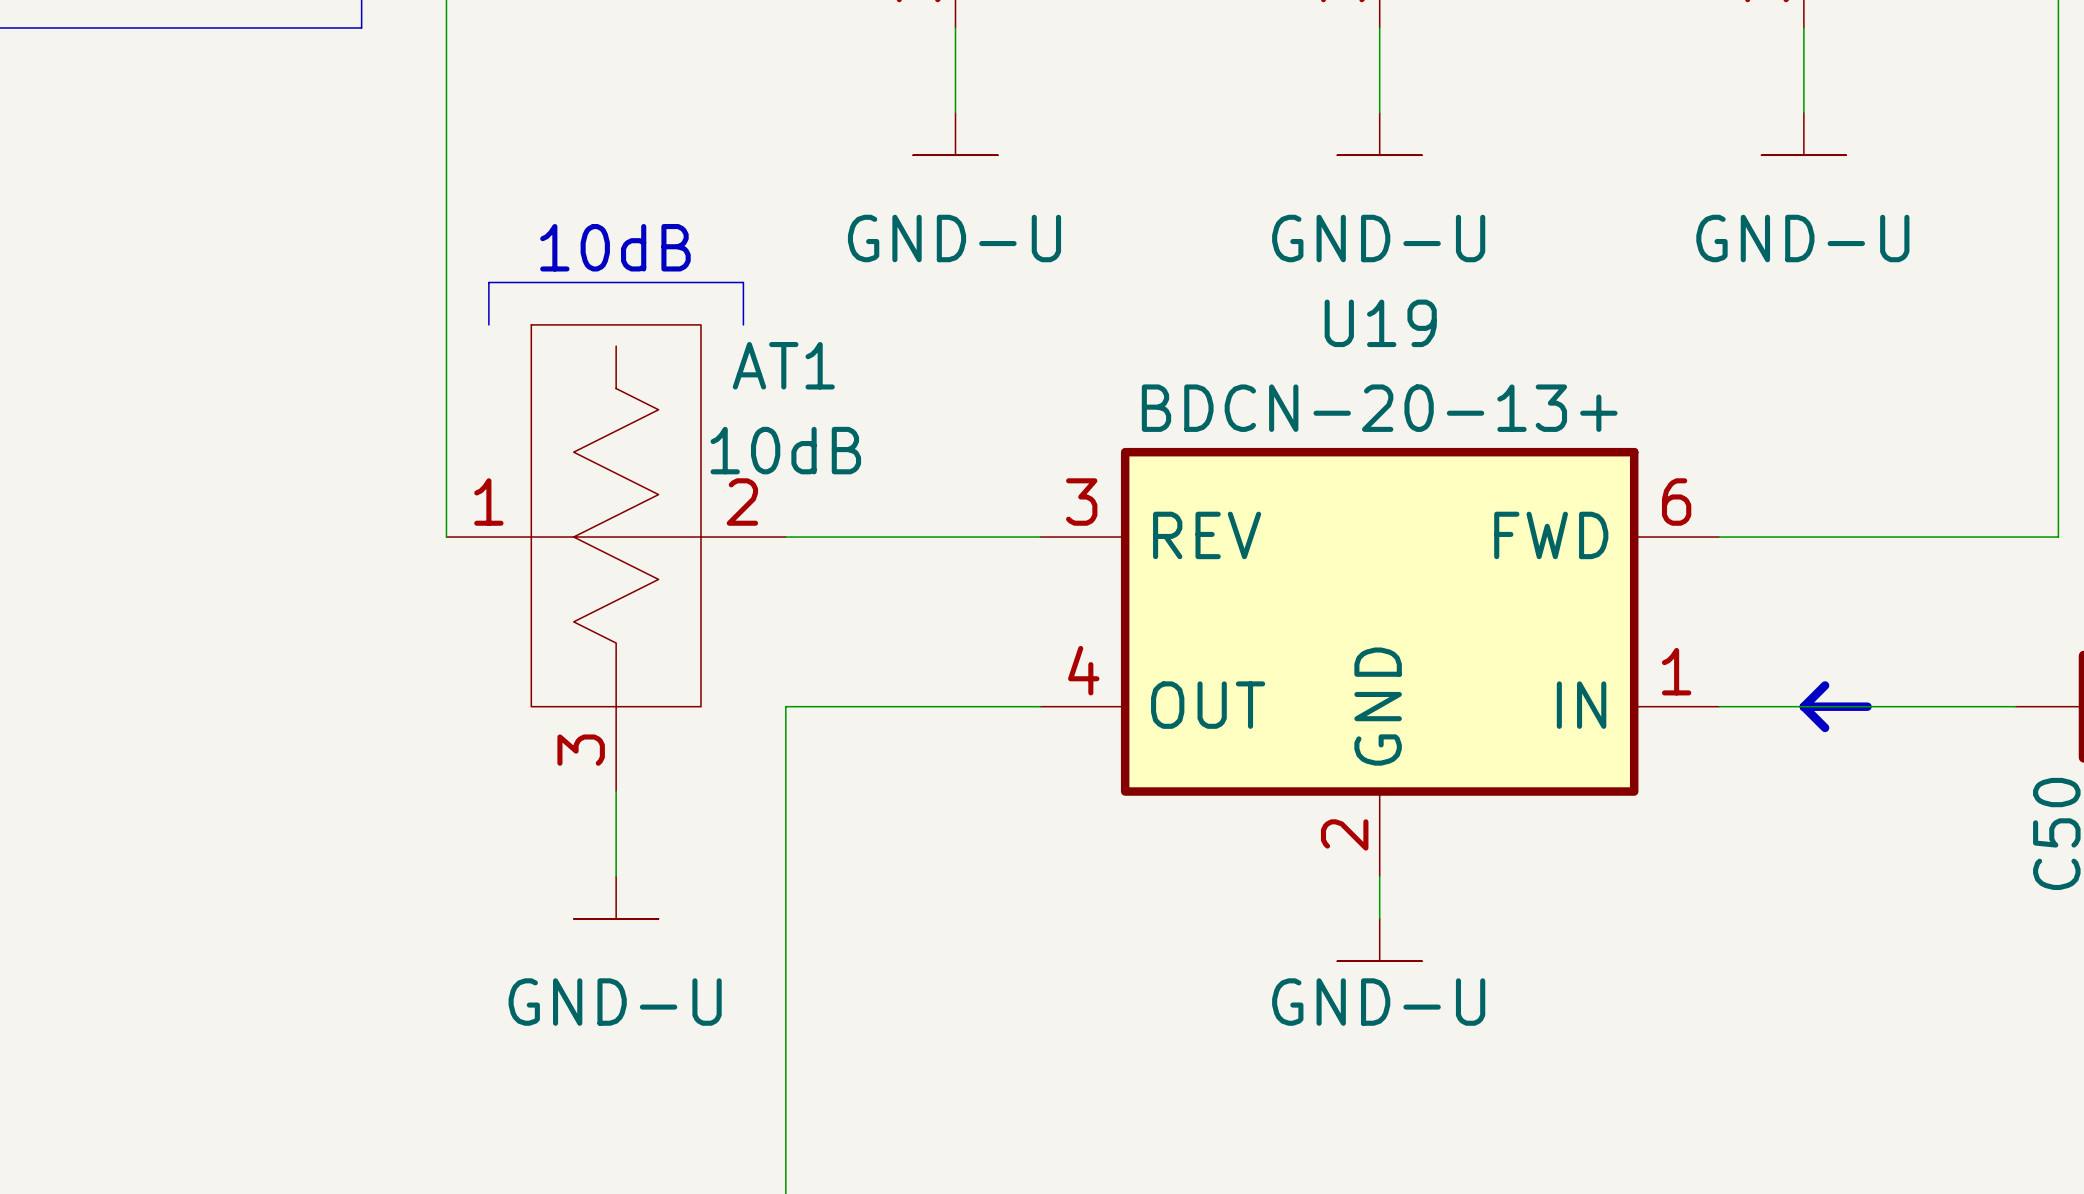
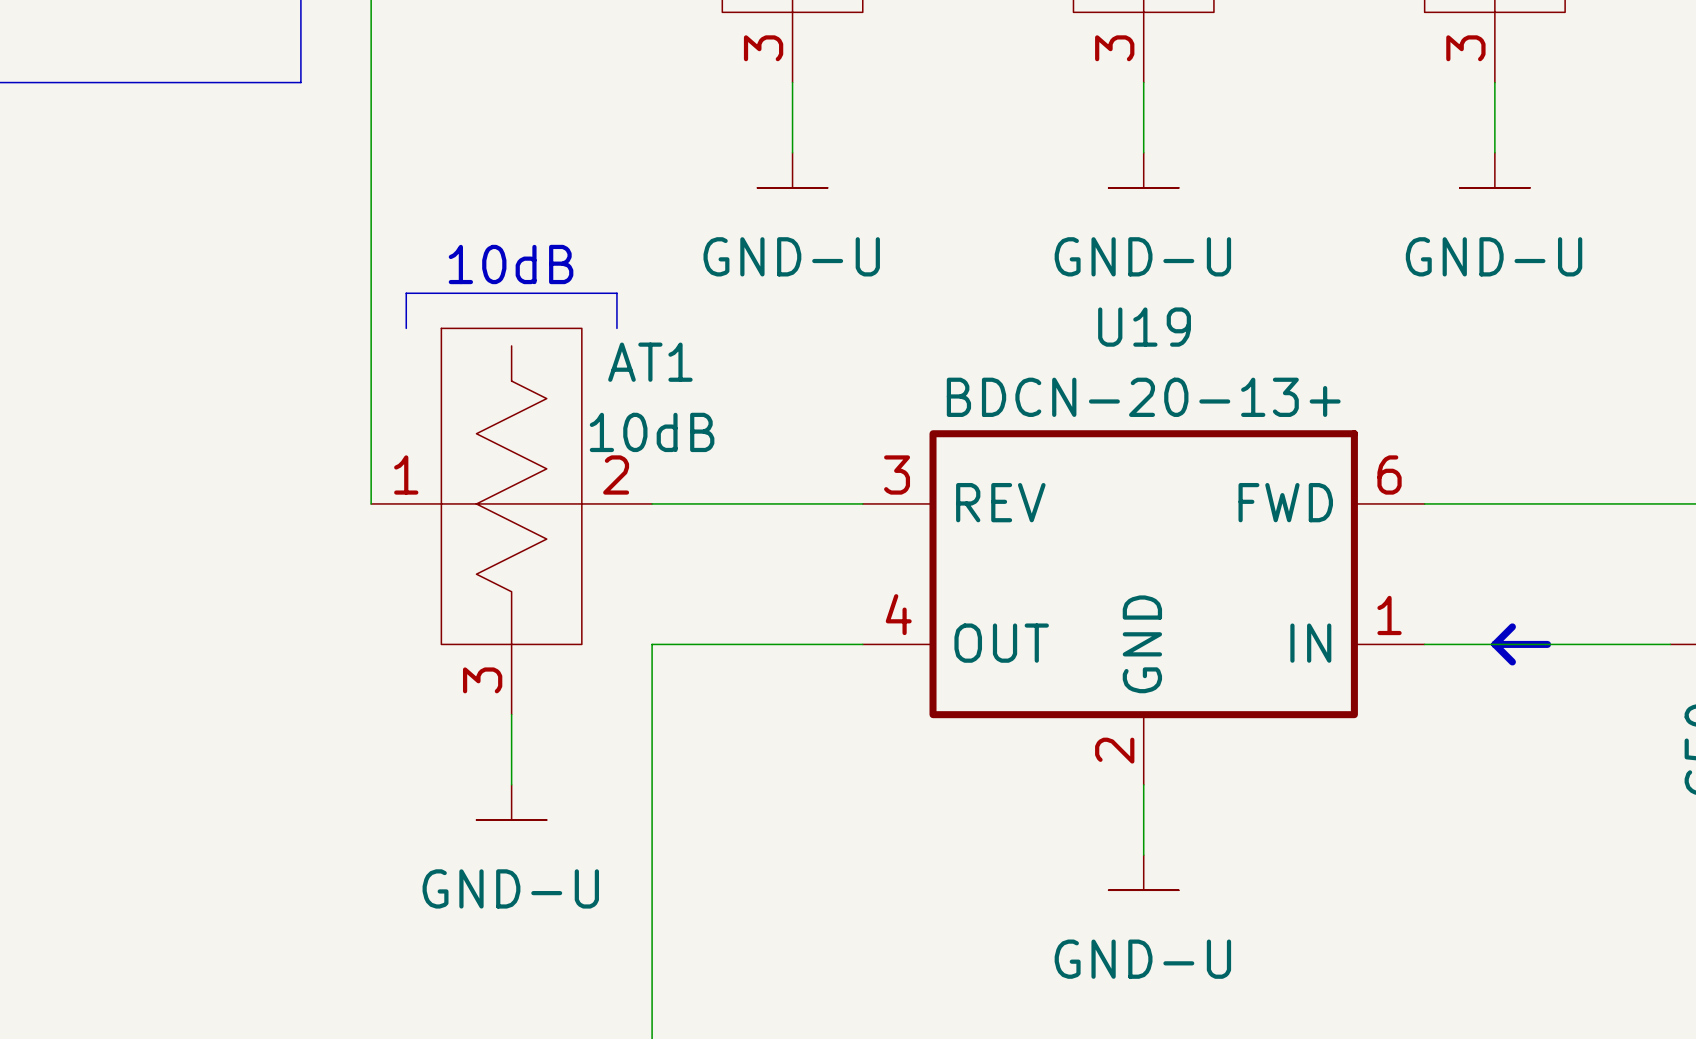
U19 symbol: [1040, 447, 1720, 877] -> [862, 430, 1425, 785]
power symbol position: GND-U (1379, 939) -> GND-U (1143, 872)
power symbol text position: GND-U (1378, 1002) -> GND-U (1142, 959)

